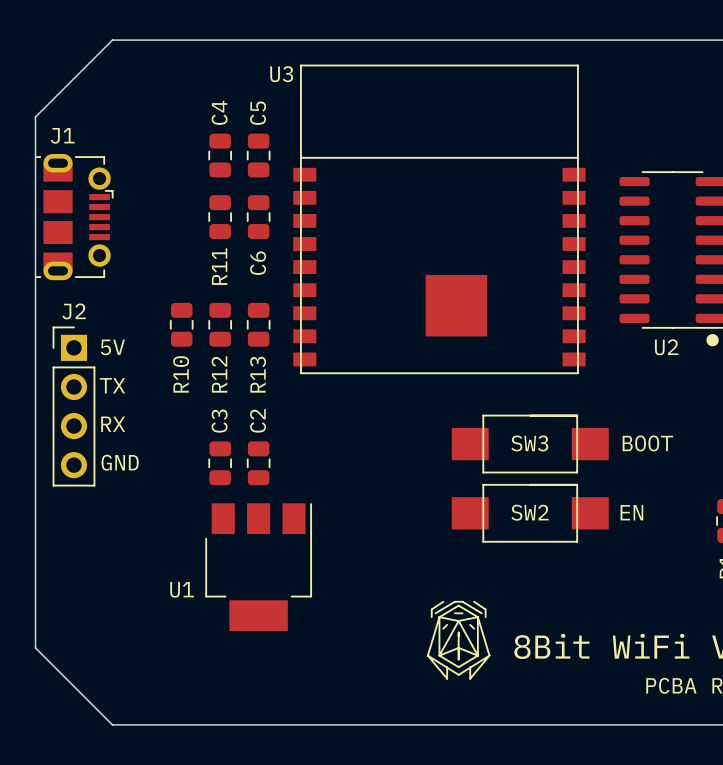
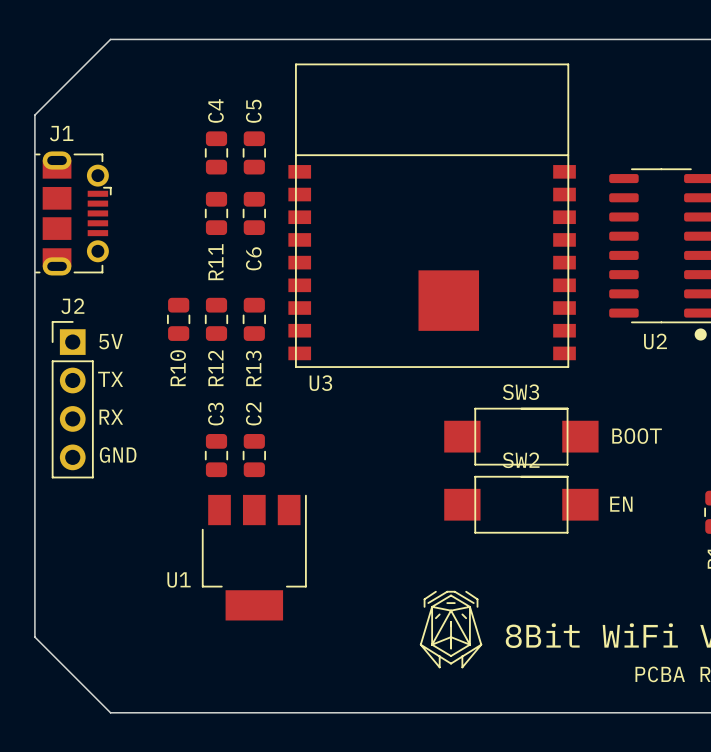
U3 name position: U3 (281, 74) -> U3 (320, 383)
SW3 name position: SW3 (529, 443) -> SW3 (520, 392)
SW2 name position: SW2 (530, 512) -> SW2 (521, 460)

